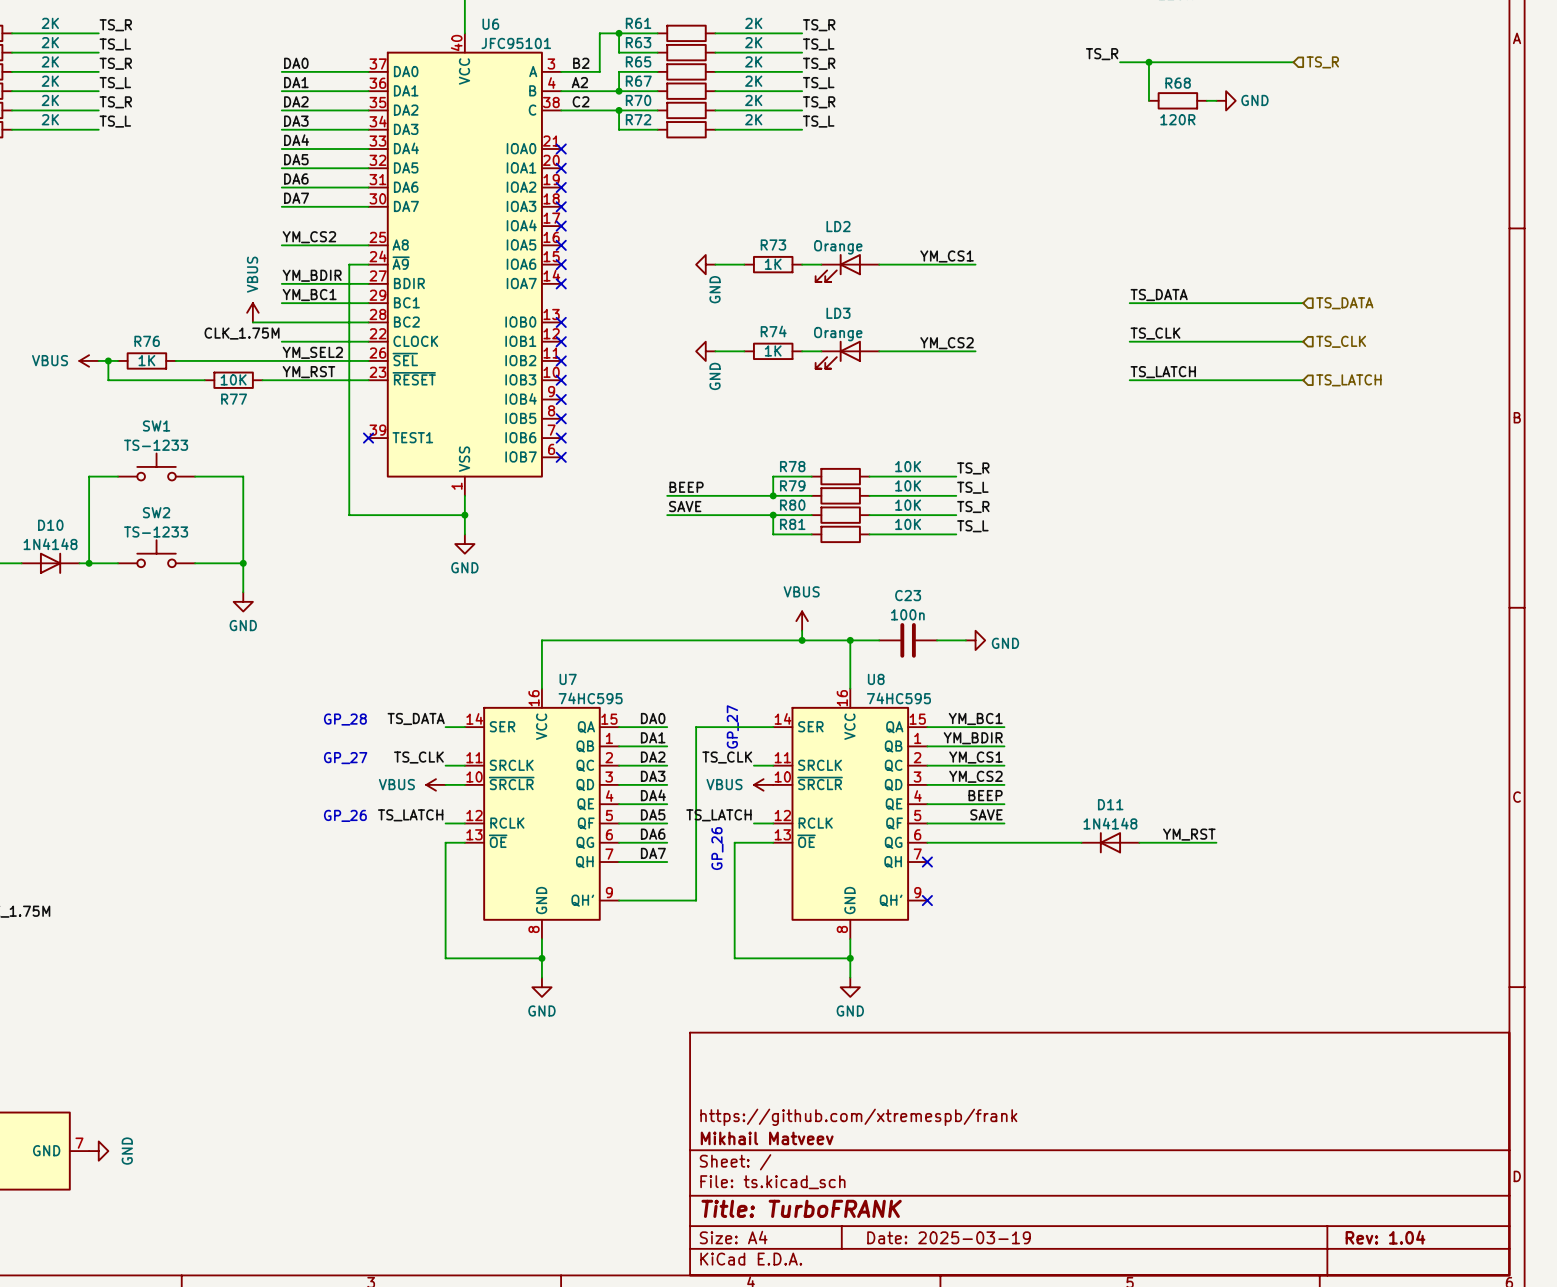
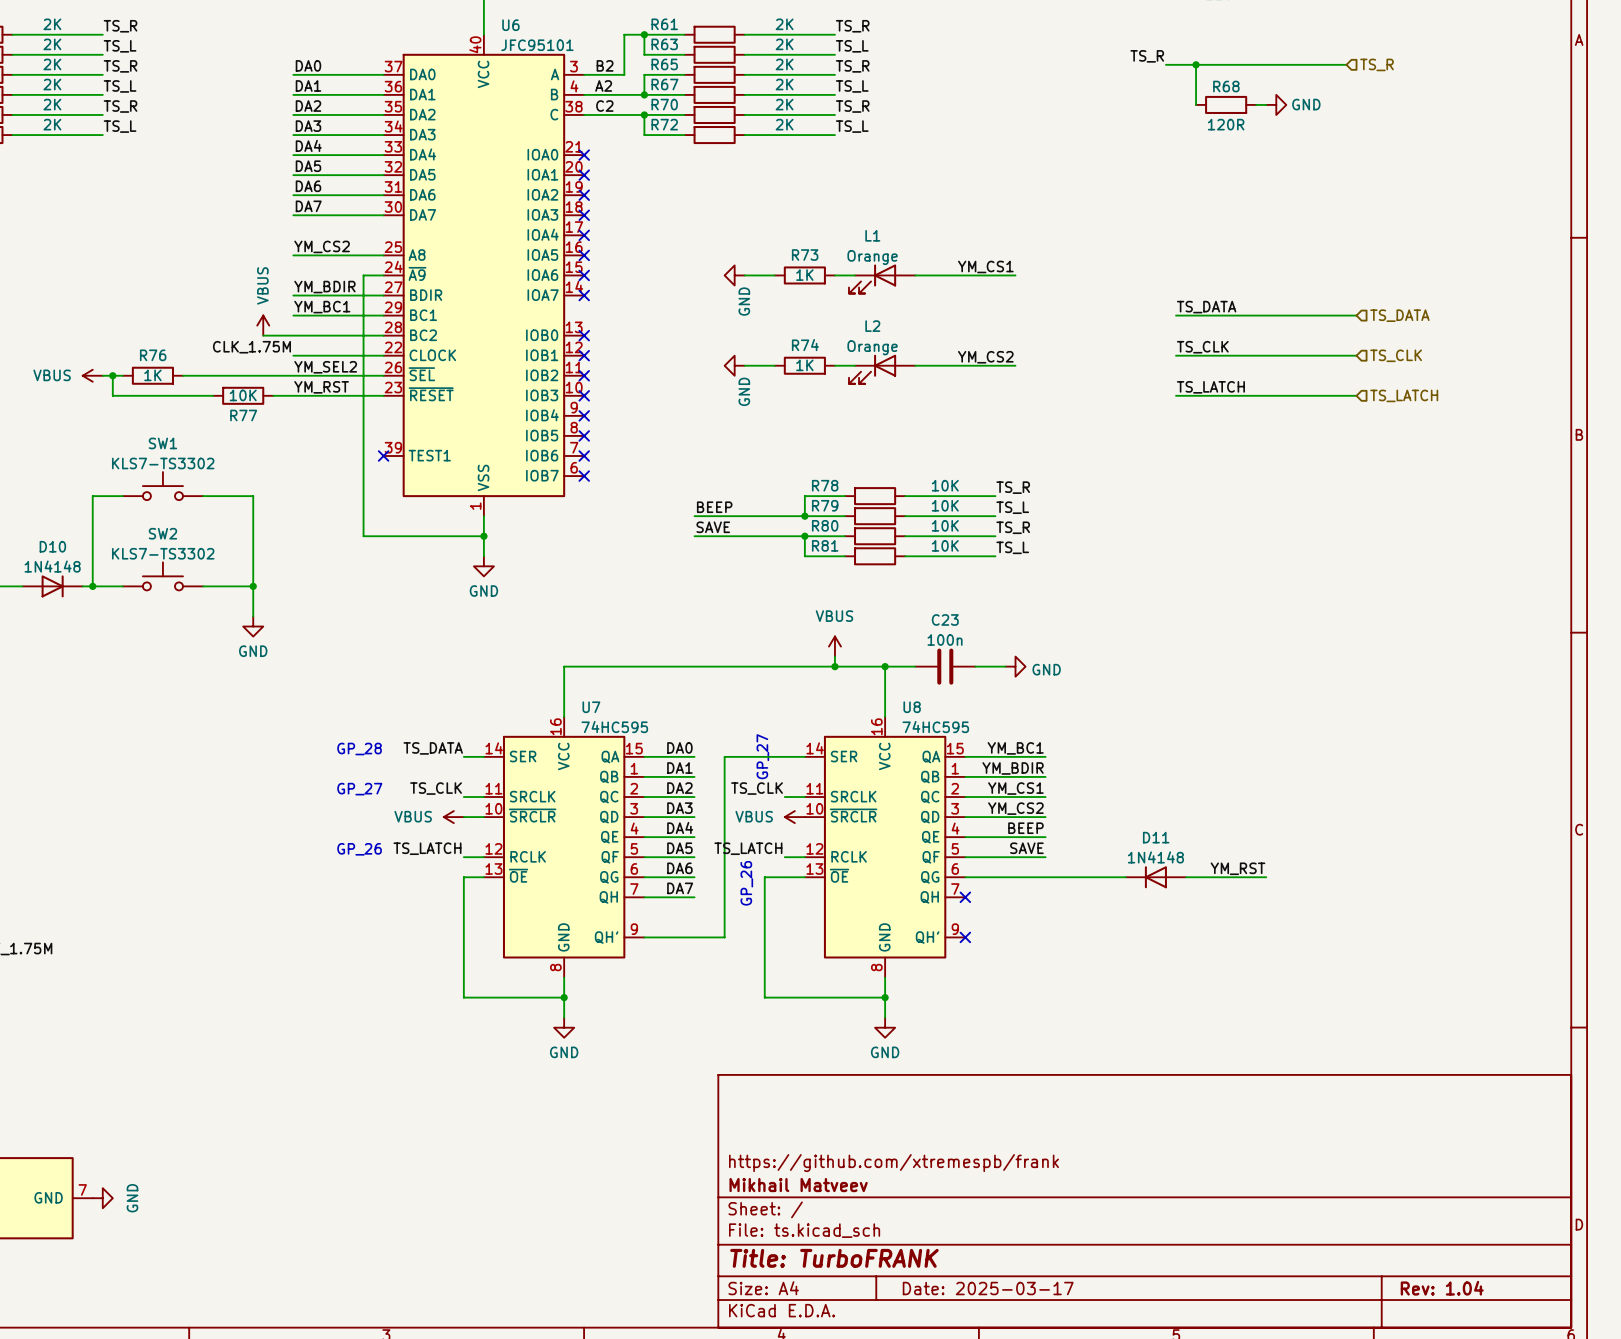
LD2 name: LD2 (838, 226) -> L1 (872, 235)
LD3 name: LD3 (838, 313) -> L2 (872, 326)
SW1 value: TS-1233 (156, 445) -> KLS7-TS3302 (163, 463)
SW2 value: TS-1233 (156, 531) -> KLS7-TS3302 (163, 553)
title block: Date: 2025-03-19 (949, 1237) -> Date: 2025-03-17 (988, 1288)

